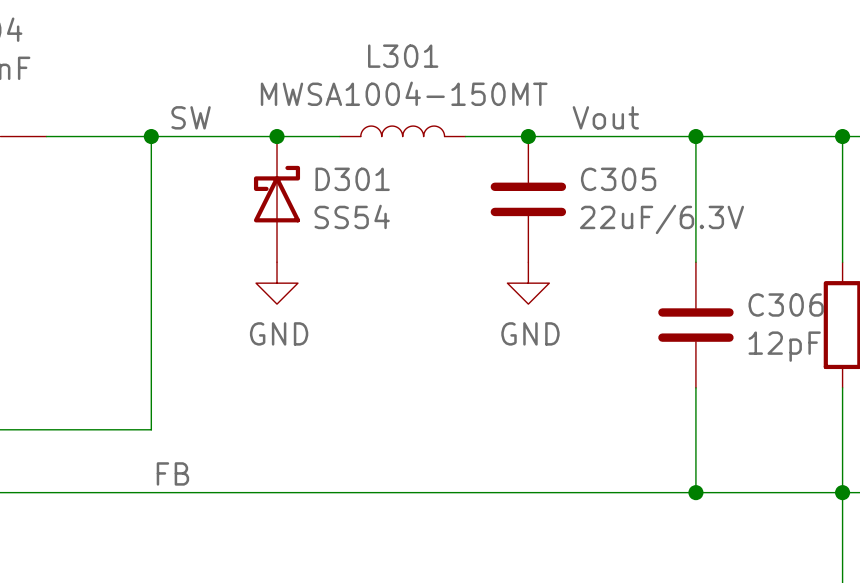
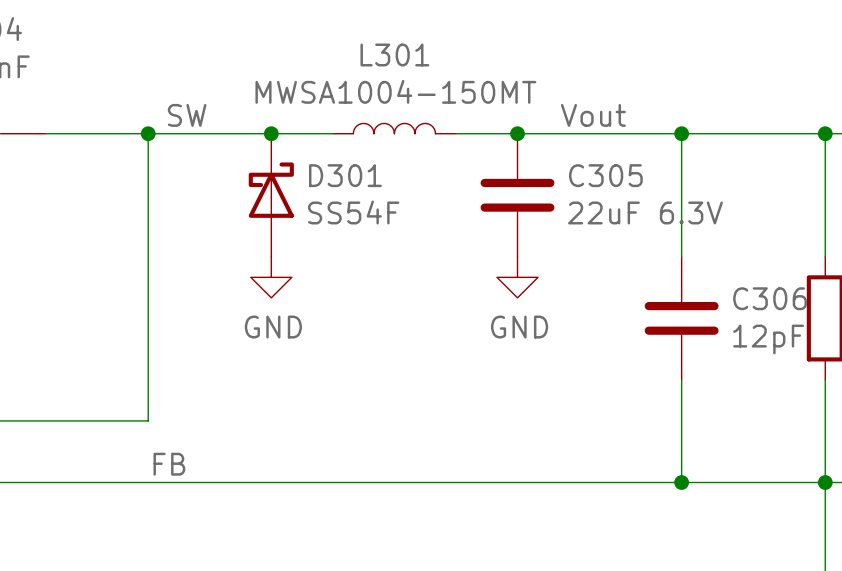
D301 value: SS54 (352, 216) -> SS54F (353, 212)
C305 value: 22uF/6.3V (661, 219) -> 22uF 6.3V (645, 212)

